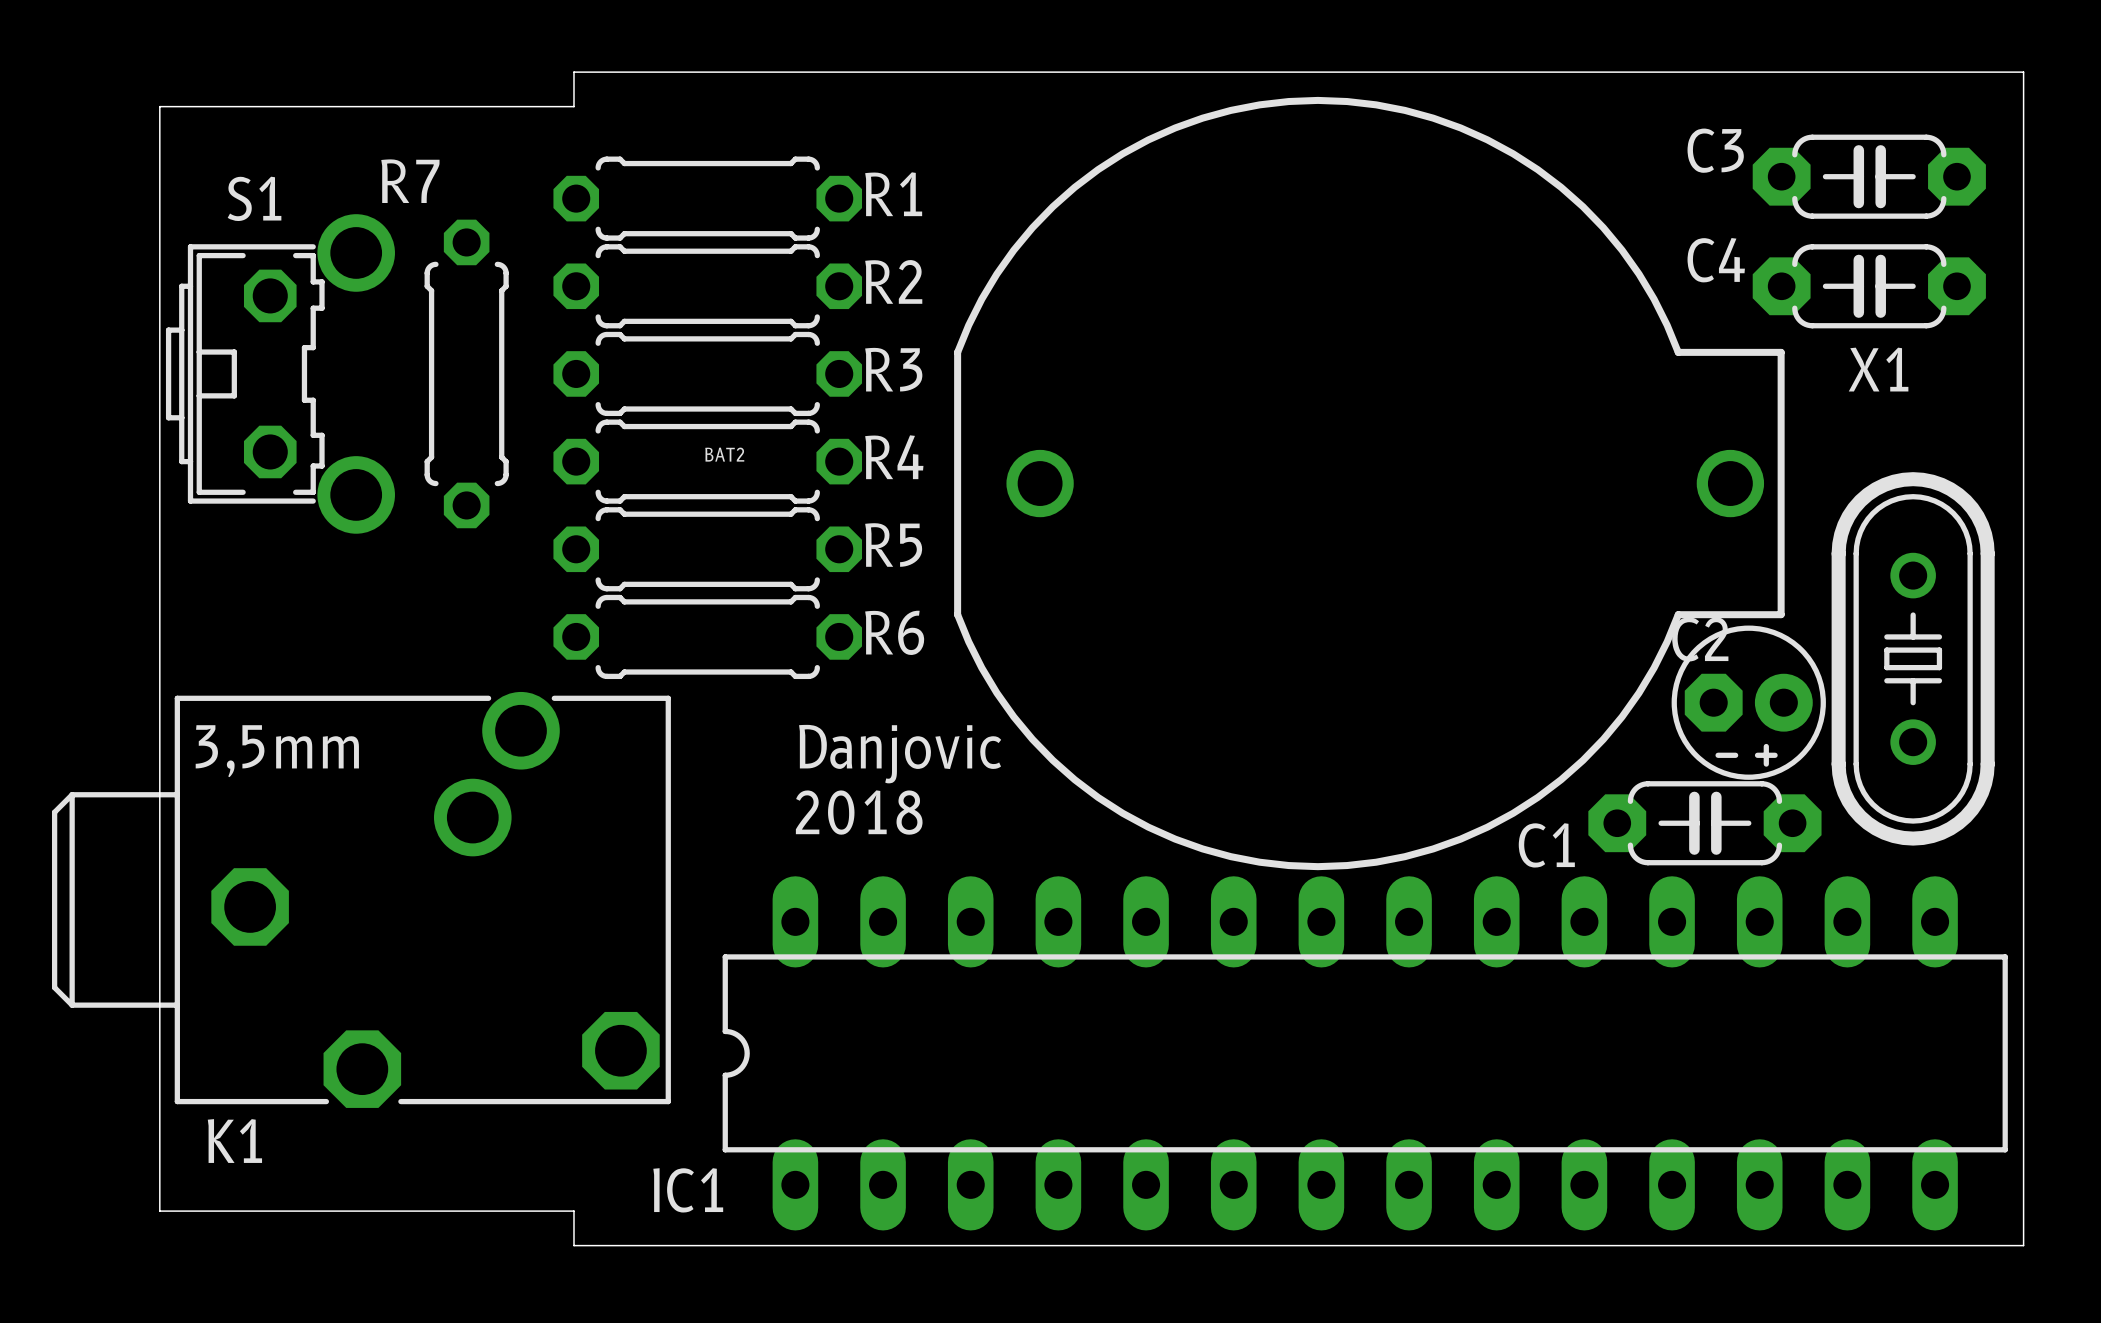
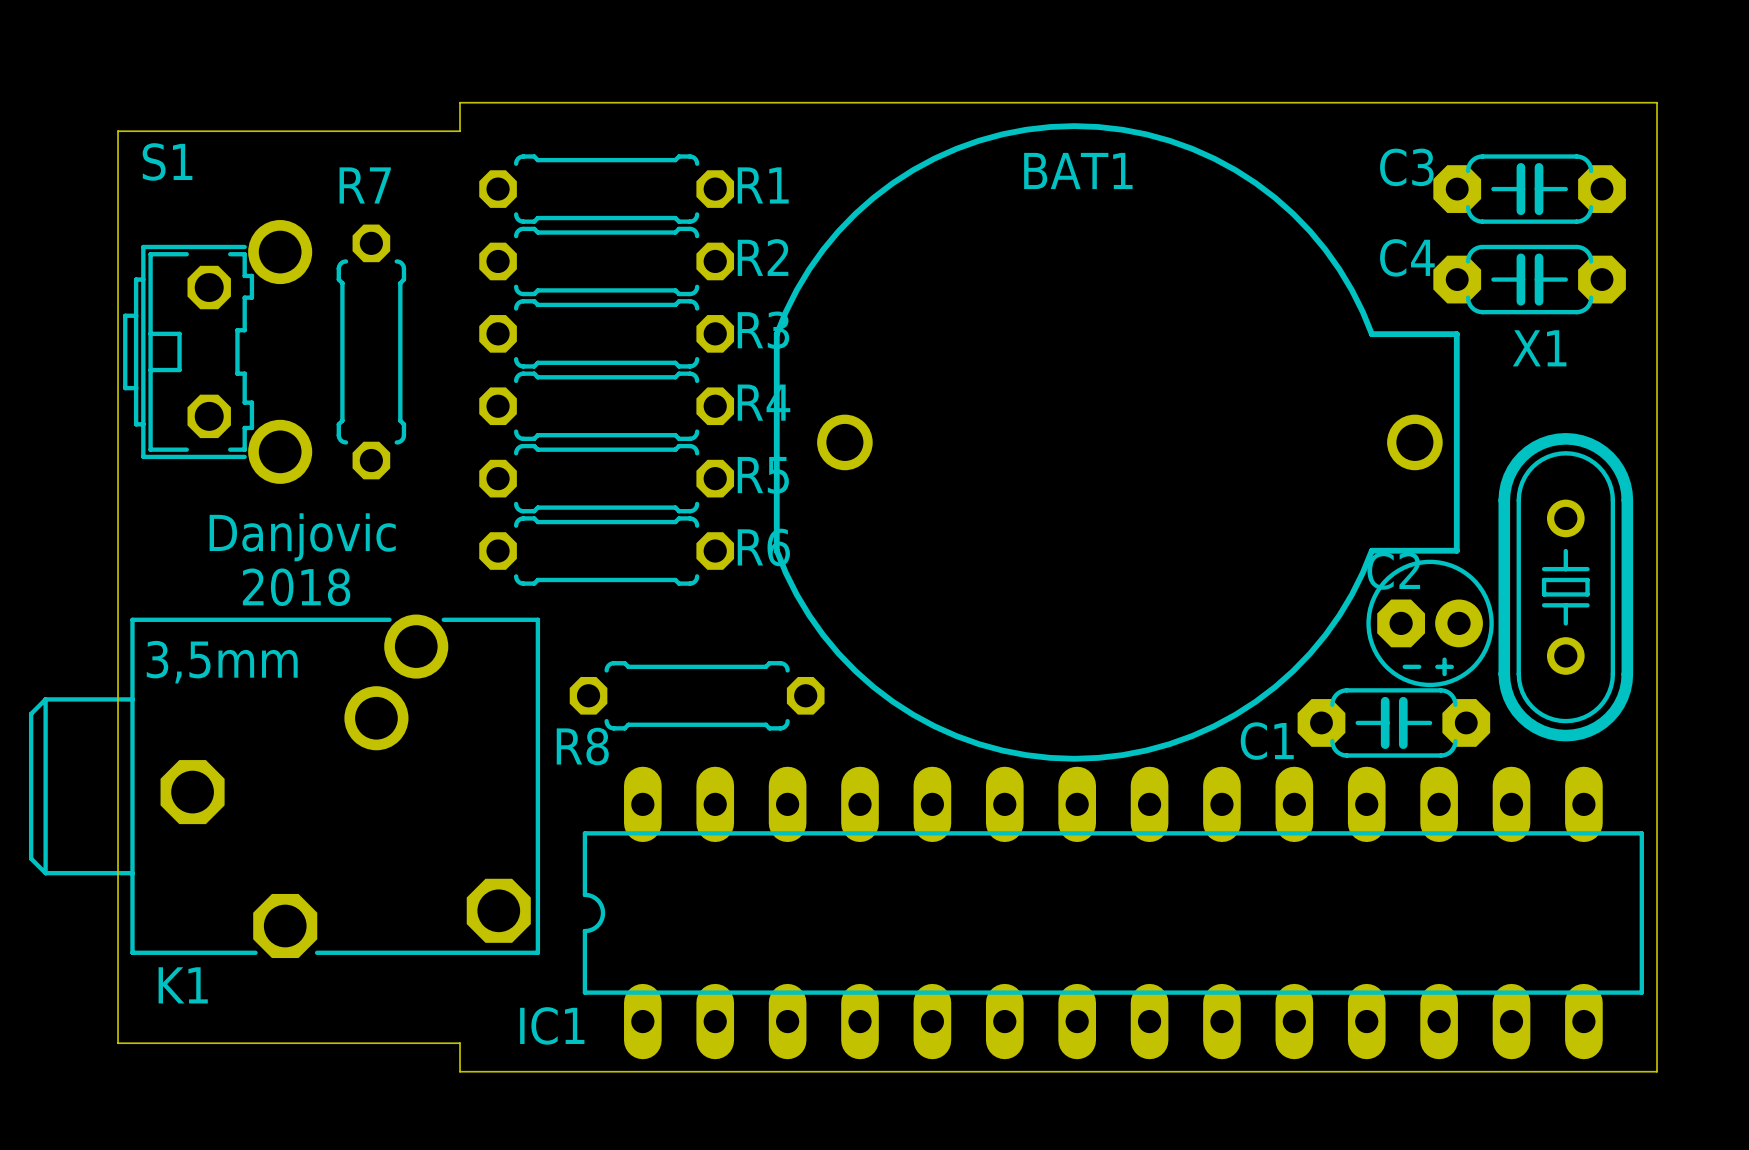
R7 name position: R7 (410, 181) -> R7 (365, 185)
S1 name position: S1 (254, 198) -> S1 (167, 161)
R1 position: (707, 198) -> (606, 189)
R2 position: (707, 286) -> (606, 261)
R3 position: (707, 373) -> (606, 333)
BAT2 name: BAT2 (724, 454) -> BAT1 (1078, 170)
R4 position: (707, 461) -> (606, 406)
R5 position: (707, 549) -> (606, 478)
R6 position: (707, 636) -> (606, 551)
text position: Danjovic (900, 754) -> Danjovic (302, 537)
R8: none -> (697, 695)
text position: 2018 (859, 812) -> 2018 (296, 587)

